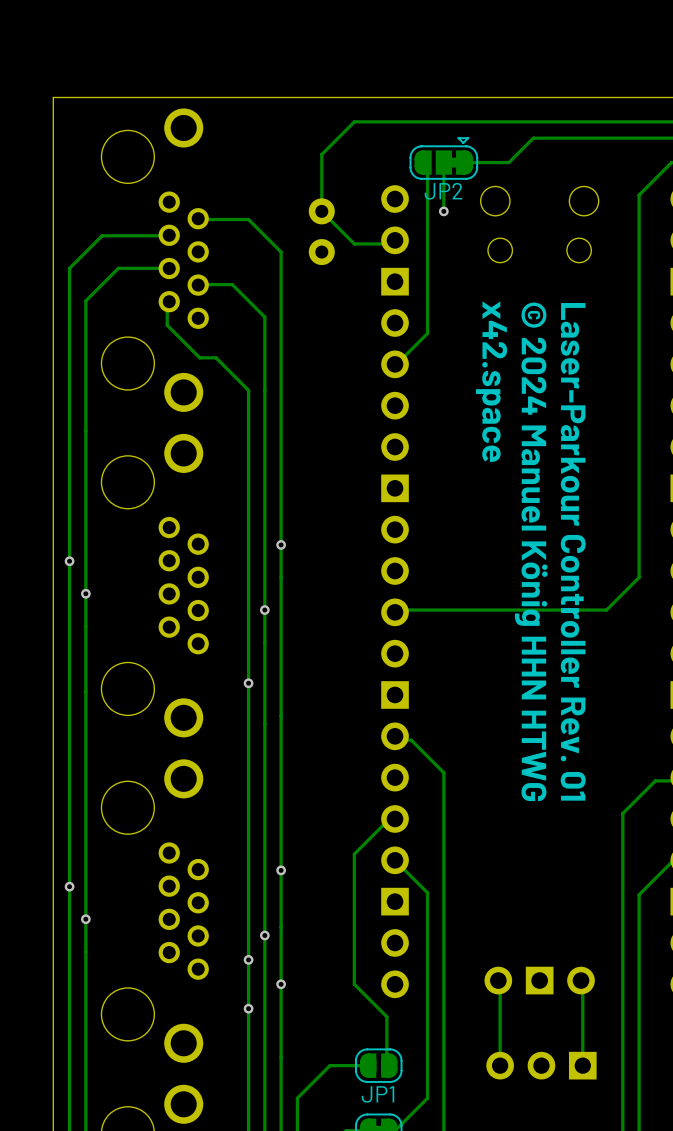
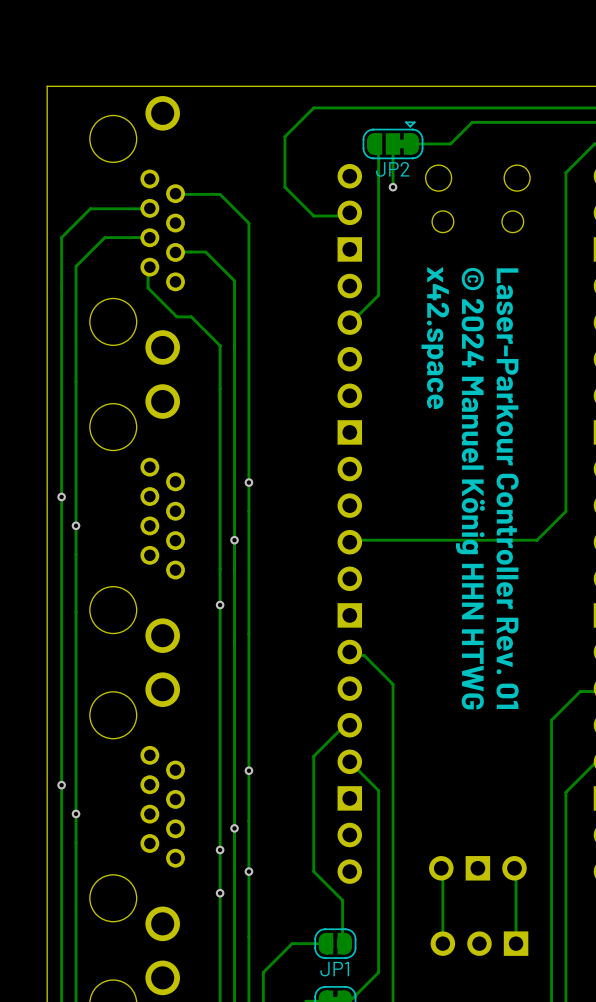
part: (321, 231) -> none

